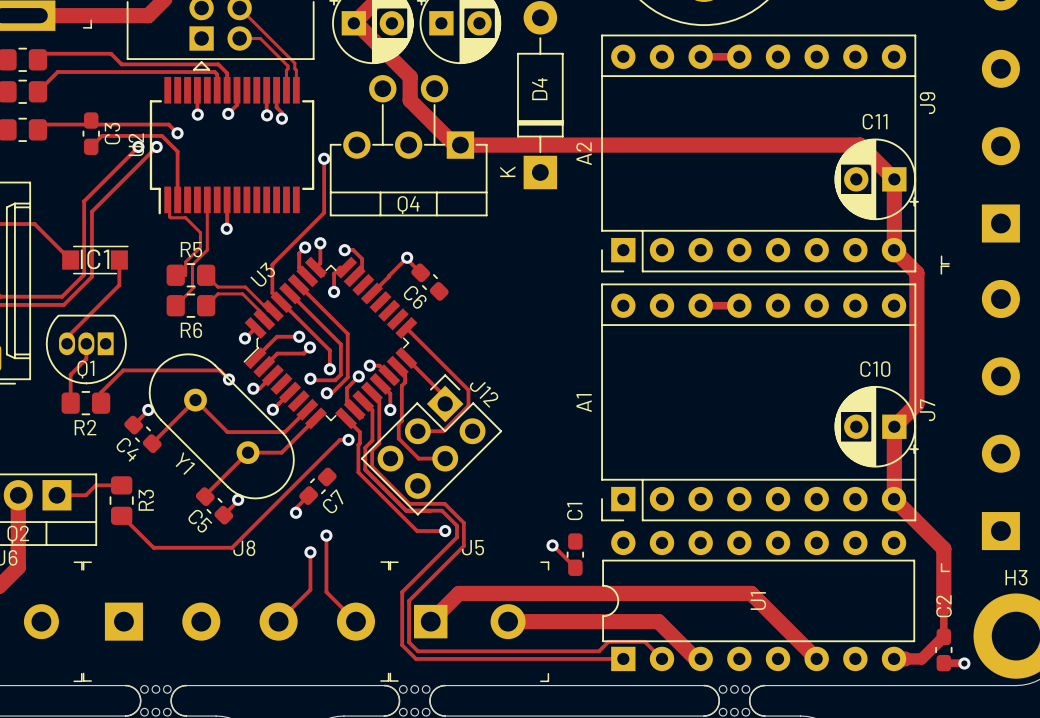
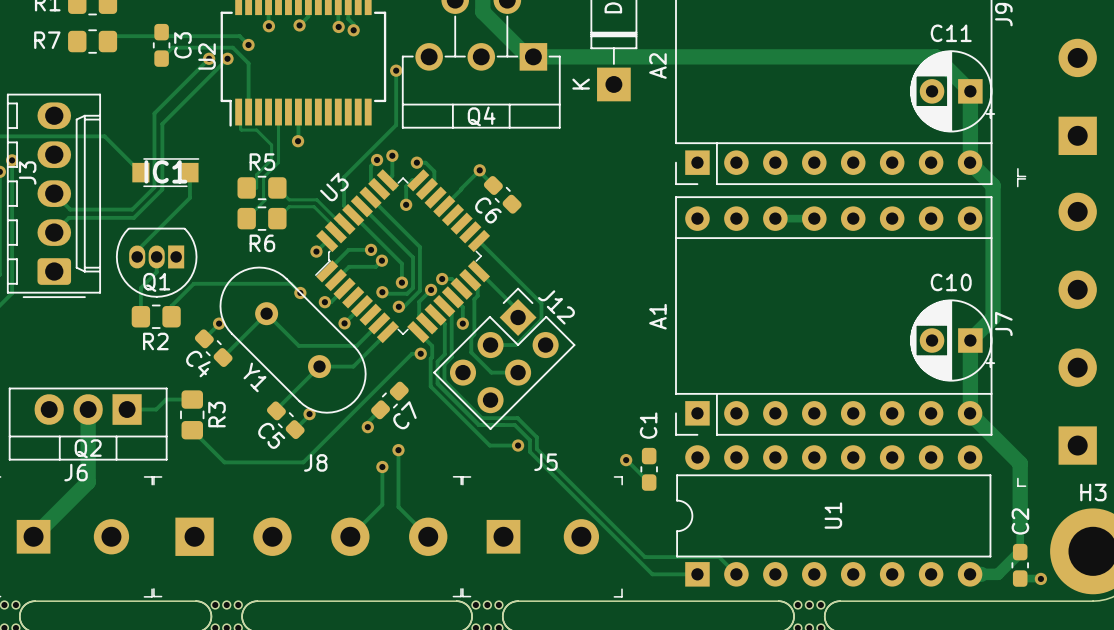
track: (463, 534) (463, 546) (409, 600) (409, 642) (418, 651) (598, 651) (608, 641) -> (536, 449) (644, 557) (682, 557)
track: (456, 537) (402, 592) (402, 645) (415, 658) (578, 658) -> (529, 451) (652, 574)
track: (430, 621) (458, 593) (751, 593) (816, 658) -> none
track: (508, 621) (658, 621) (695, 658) (700, 658) -> none

